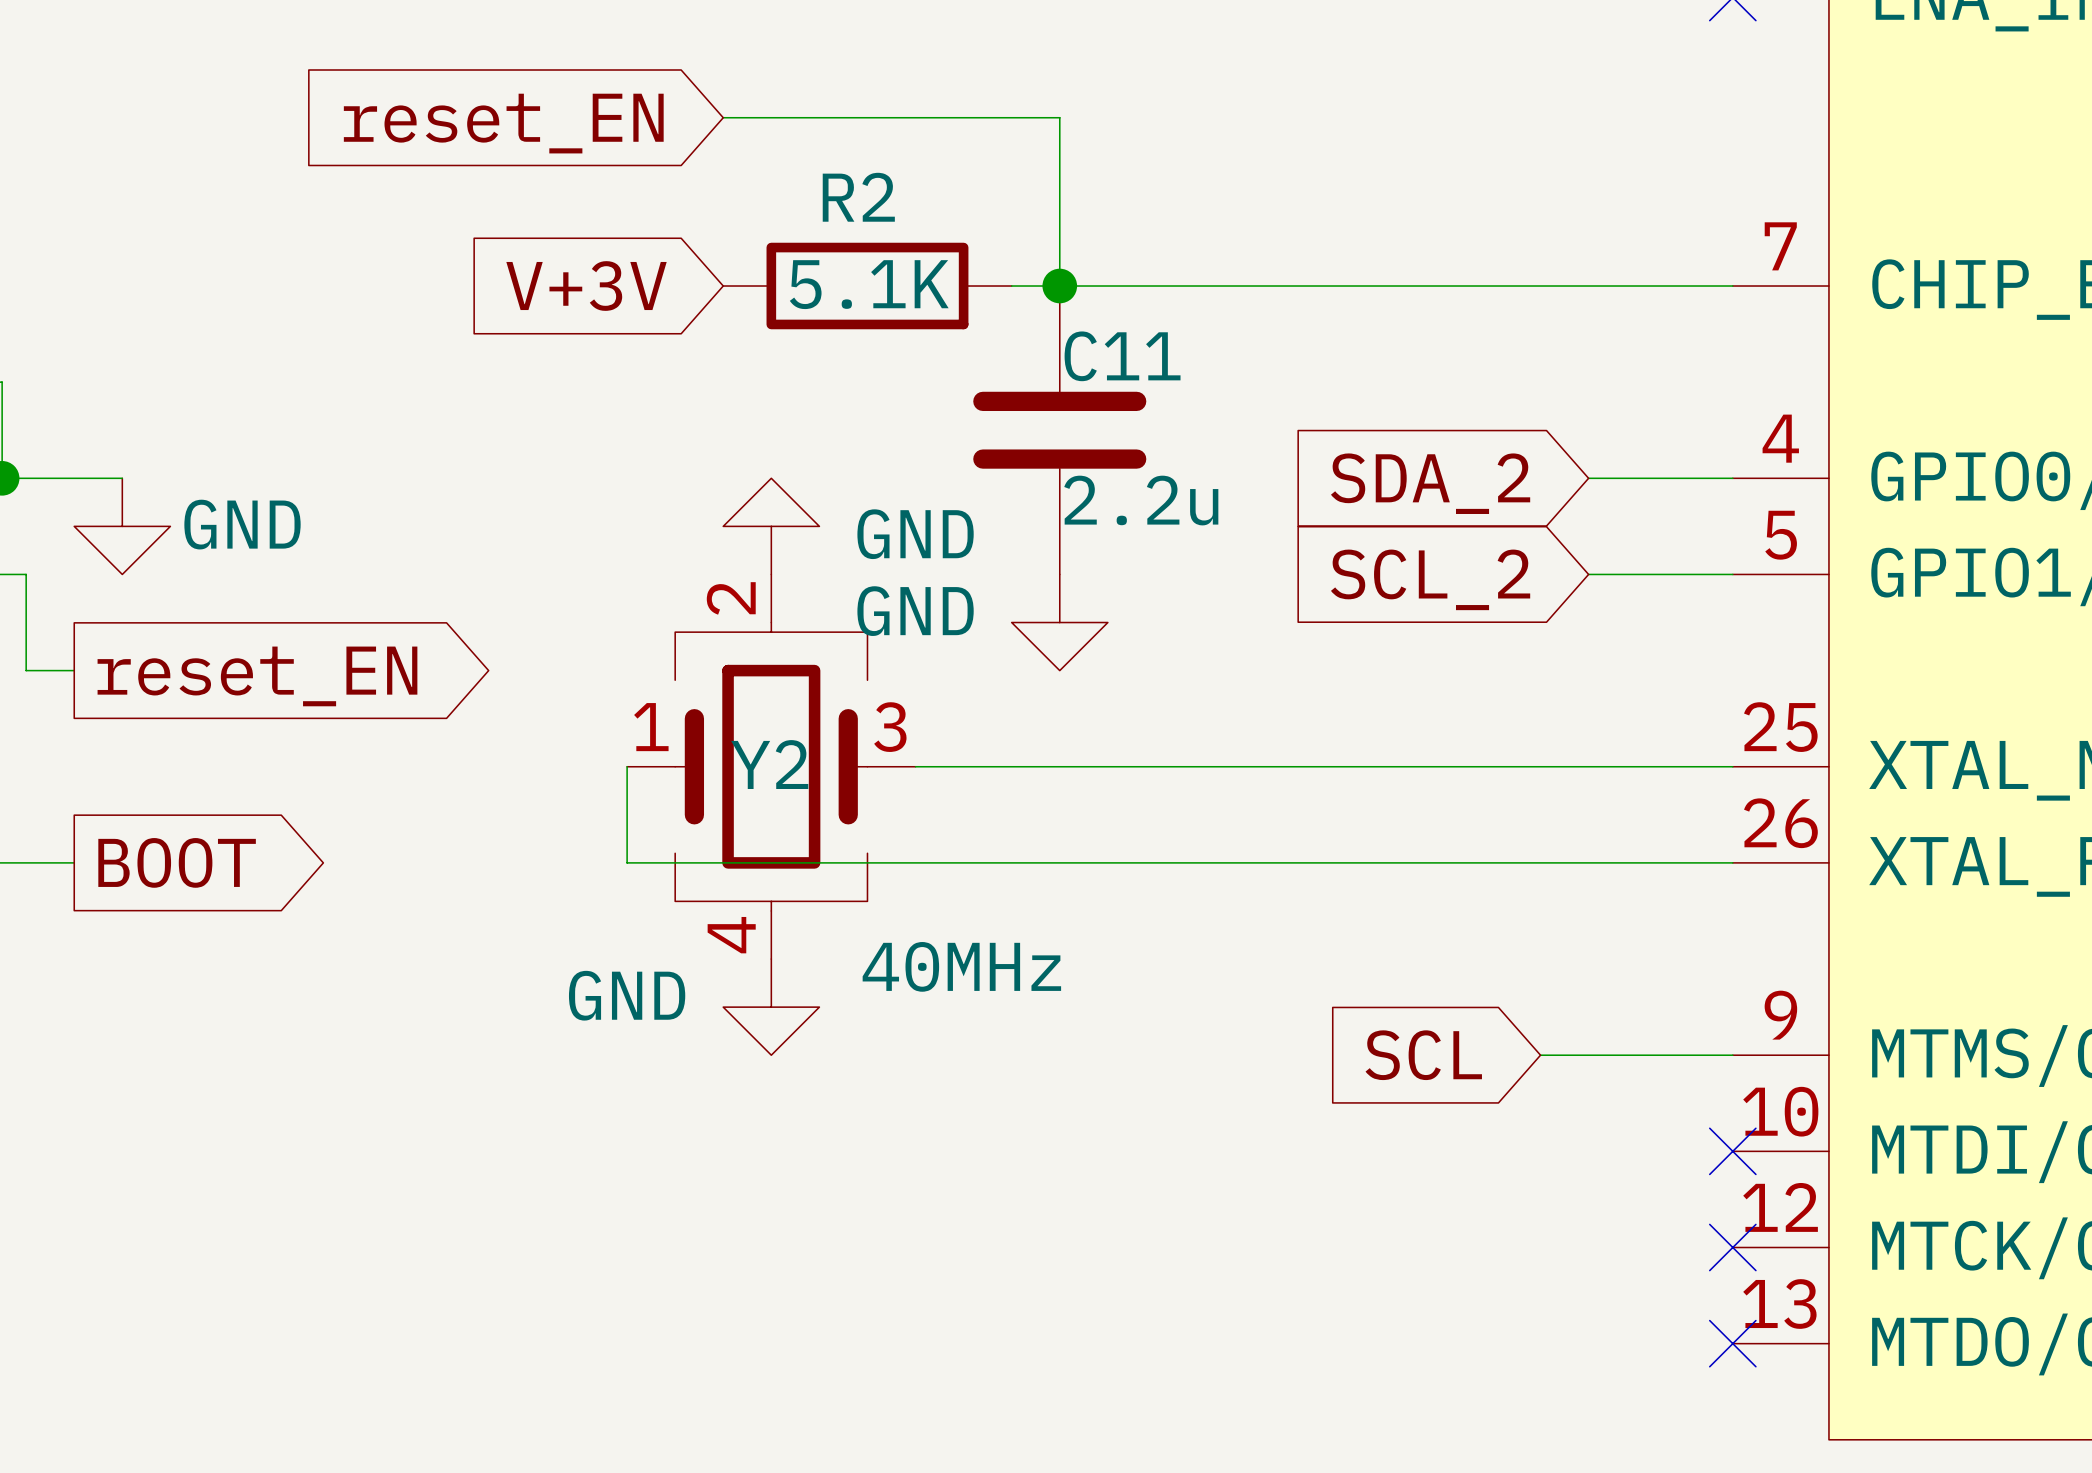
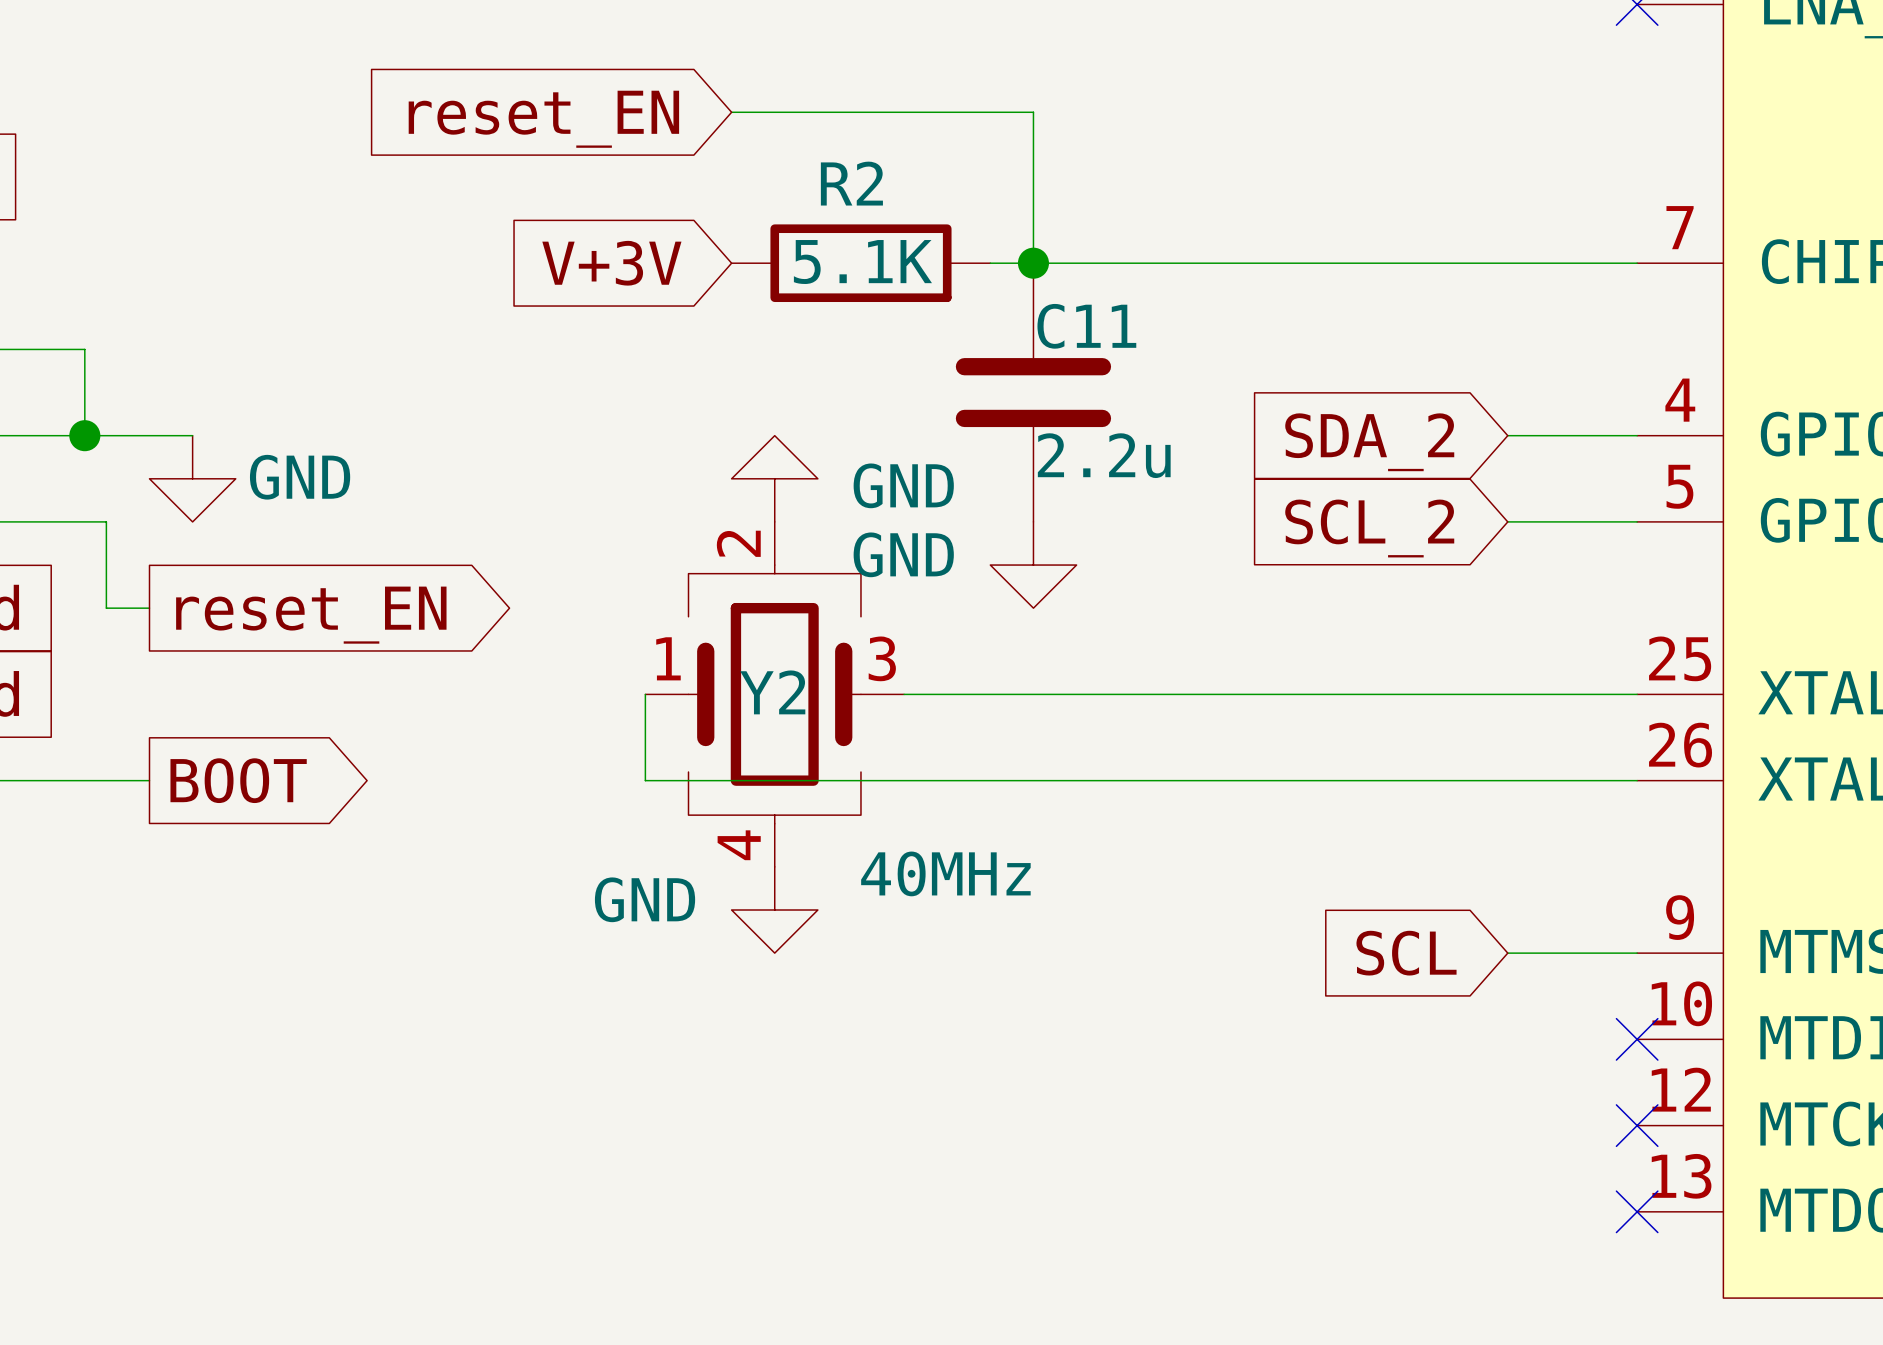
global label position: SCL (1423, 1055) -> SCL (1406, 953)
wire: (1540, 1055) (1588, 1055) -> none

